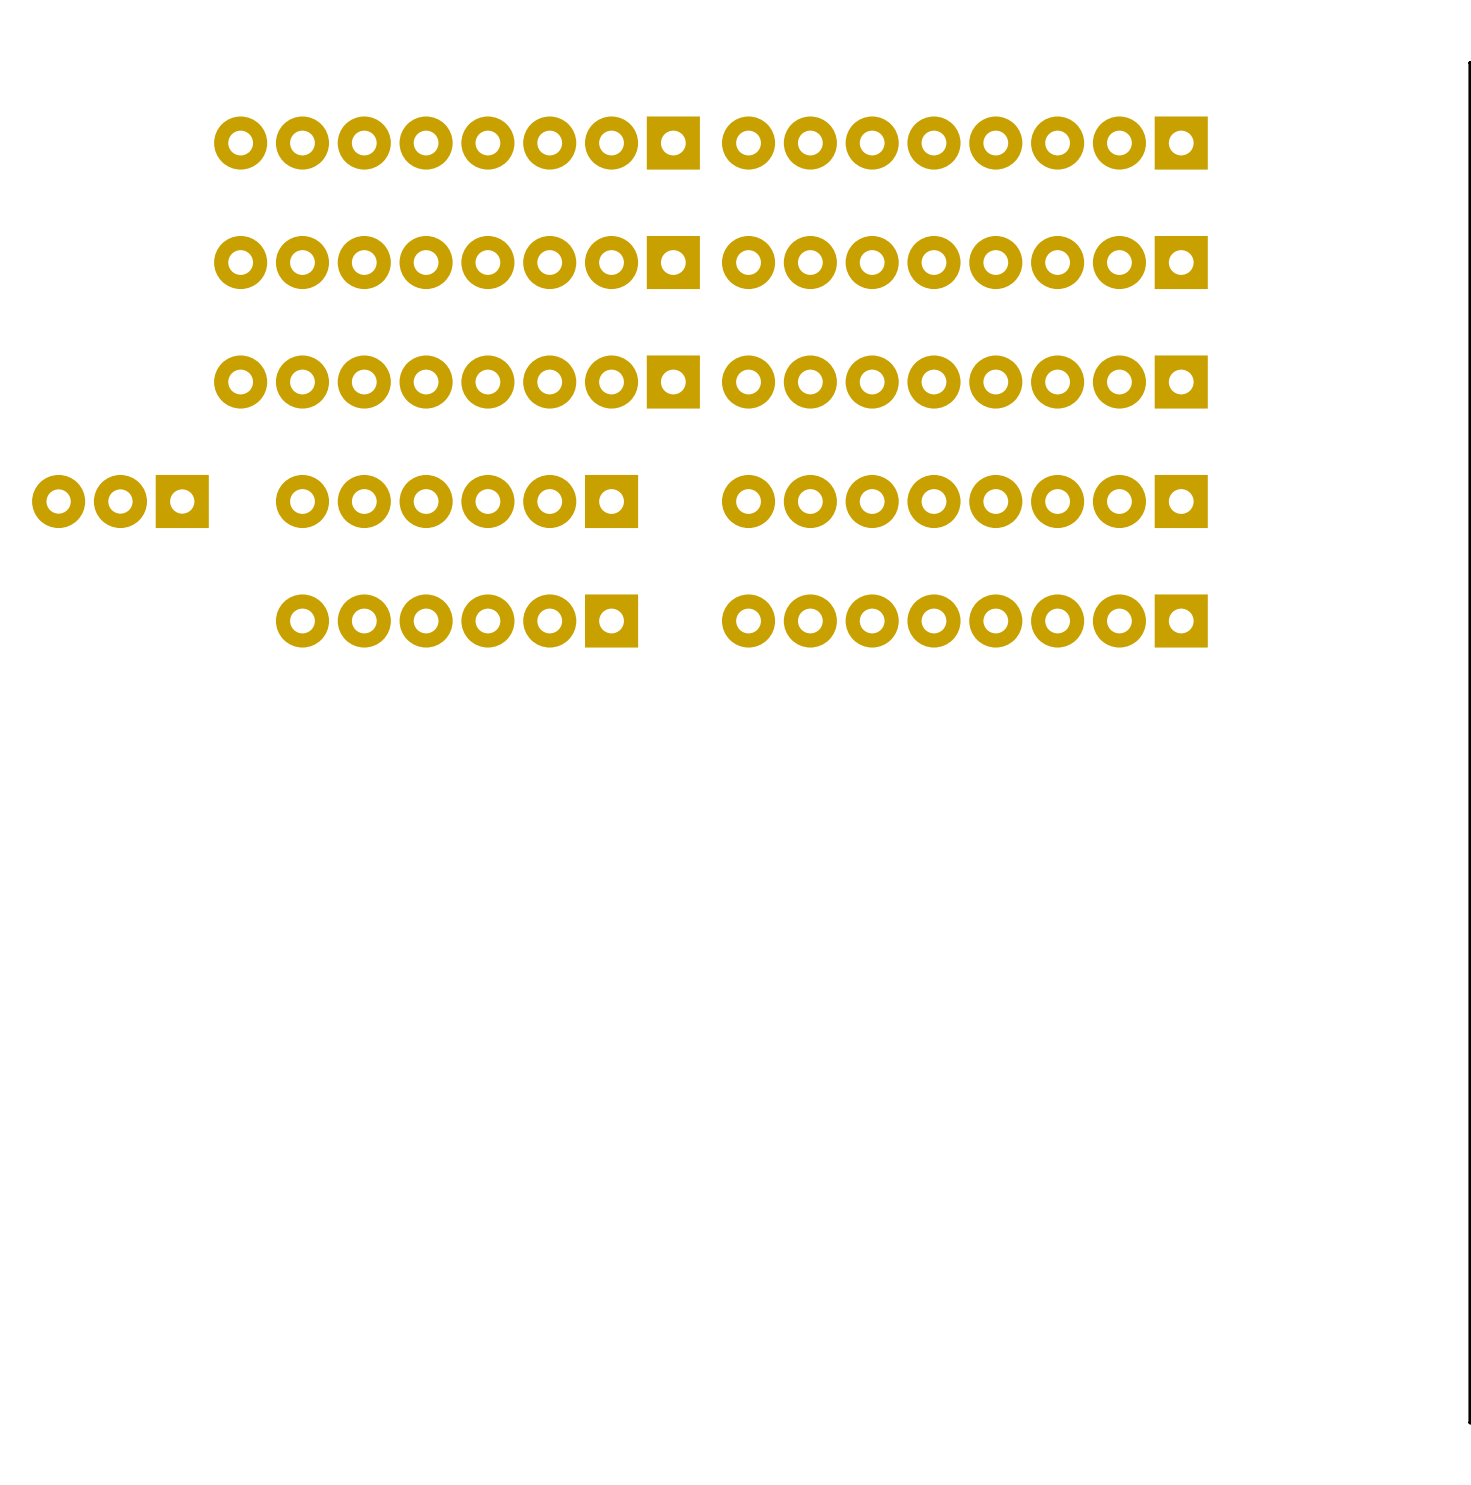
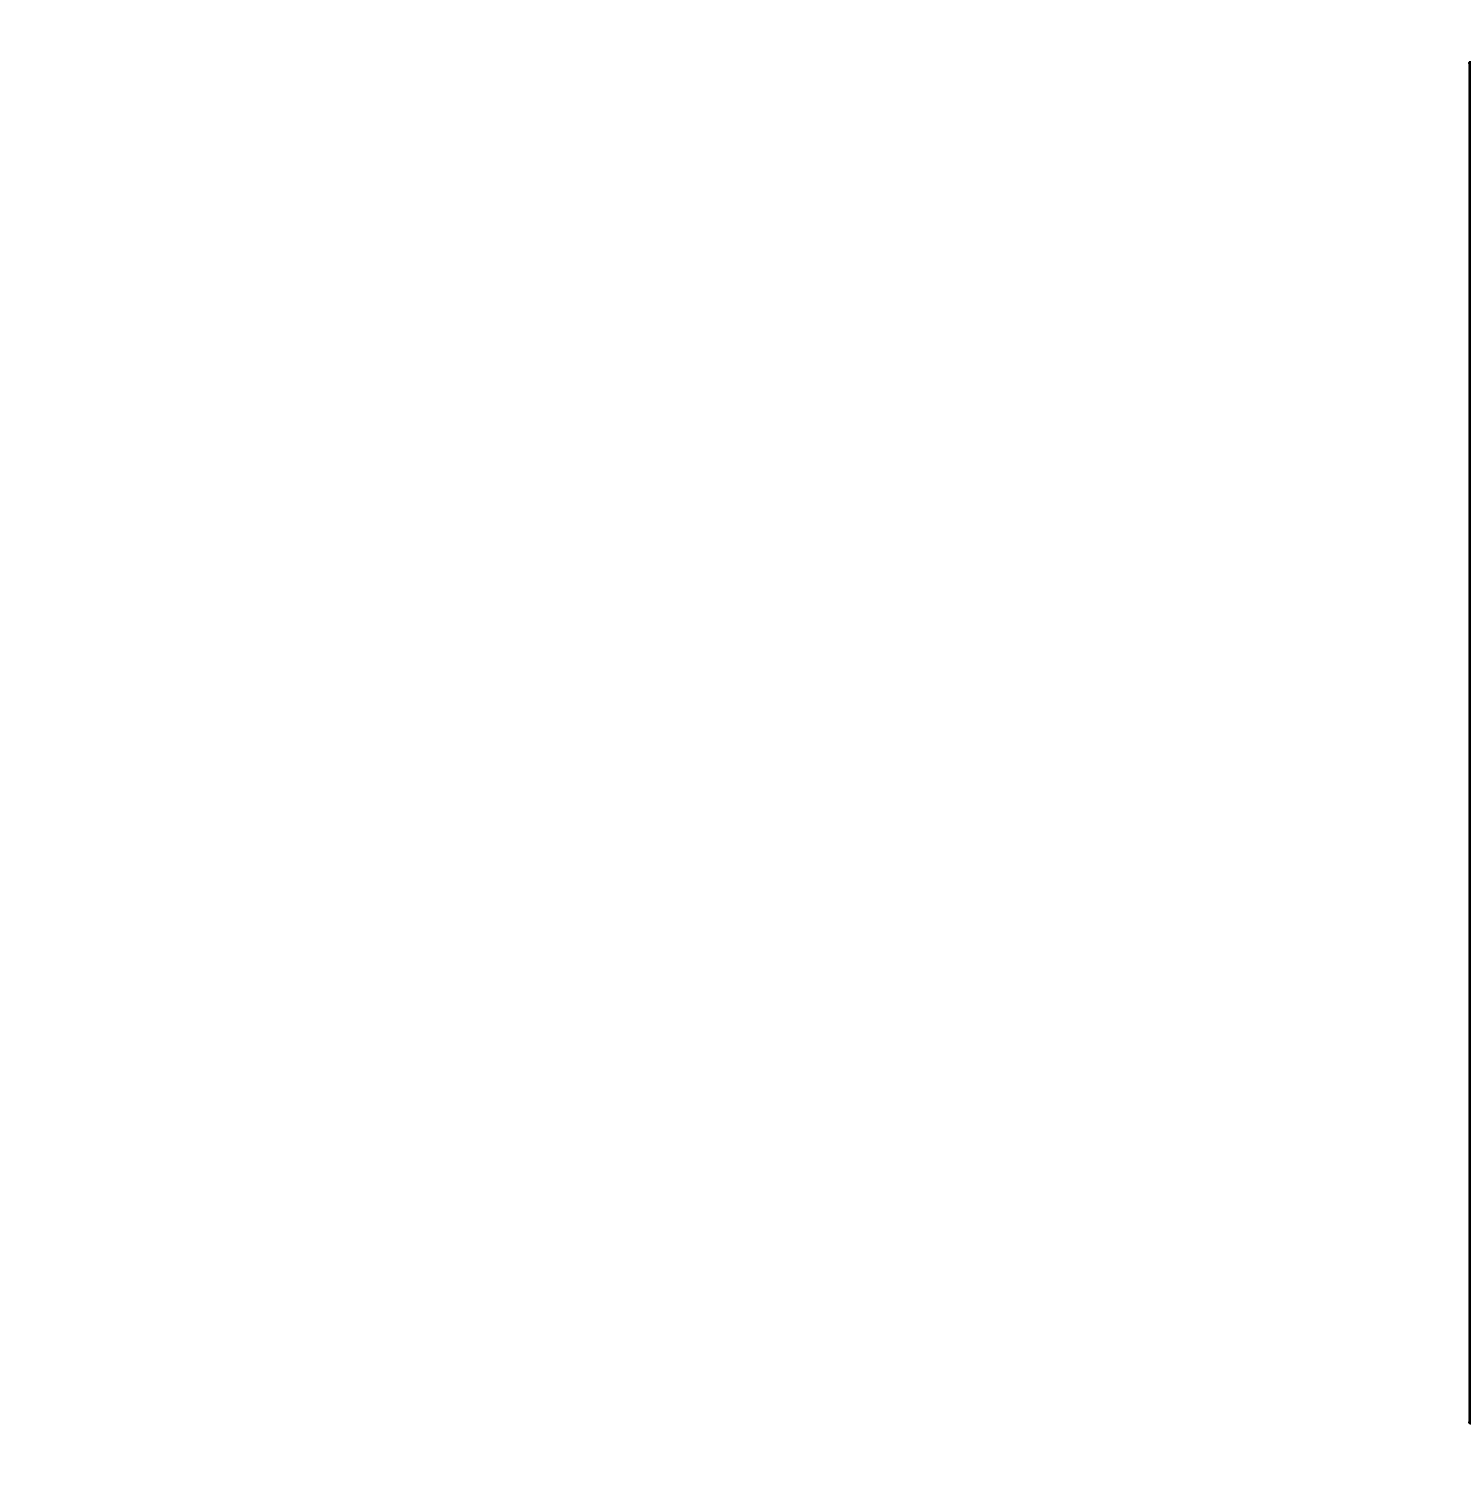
part: (456, 143) -> none
part: (964, 143) -> none
part: (456, 262) -> none
part: (964, 262) -> none
part: (456, 382) -> none
part: (964, 382) -> none
part: (120, 501) -> none
part: (457, 501) -> none
part: (964, 501) -> none
part: (457, 621) -> none
part: (964, 621) -> none

